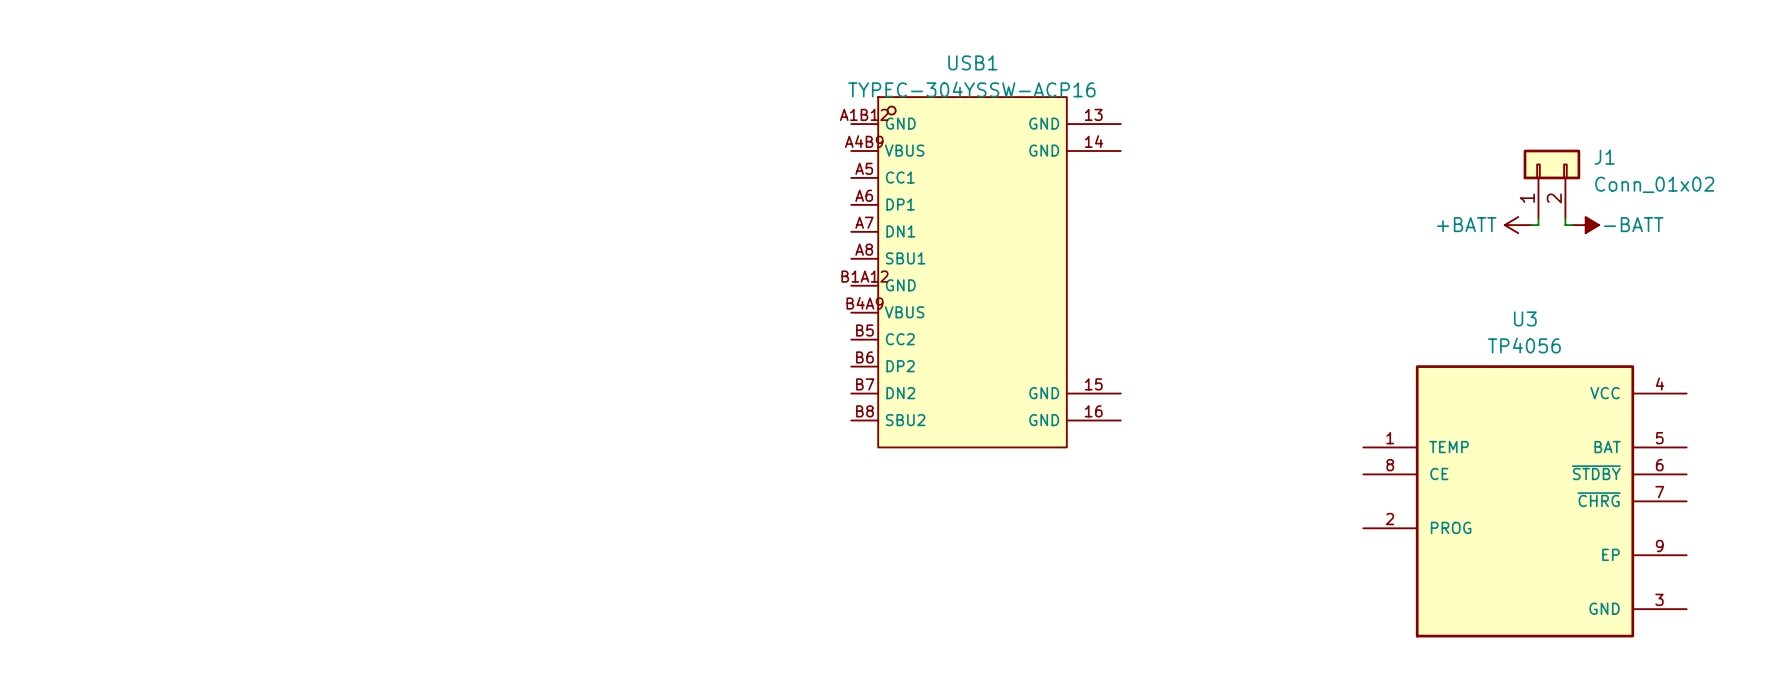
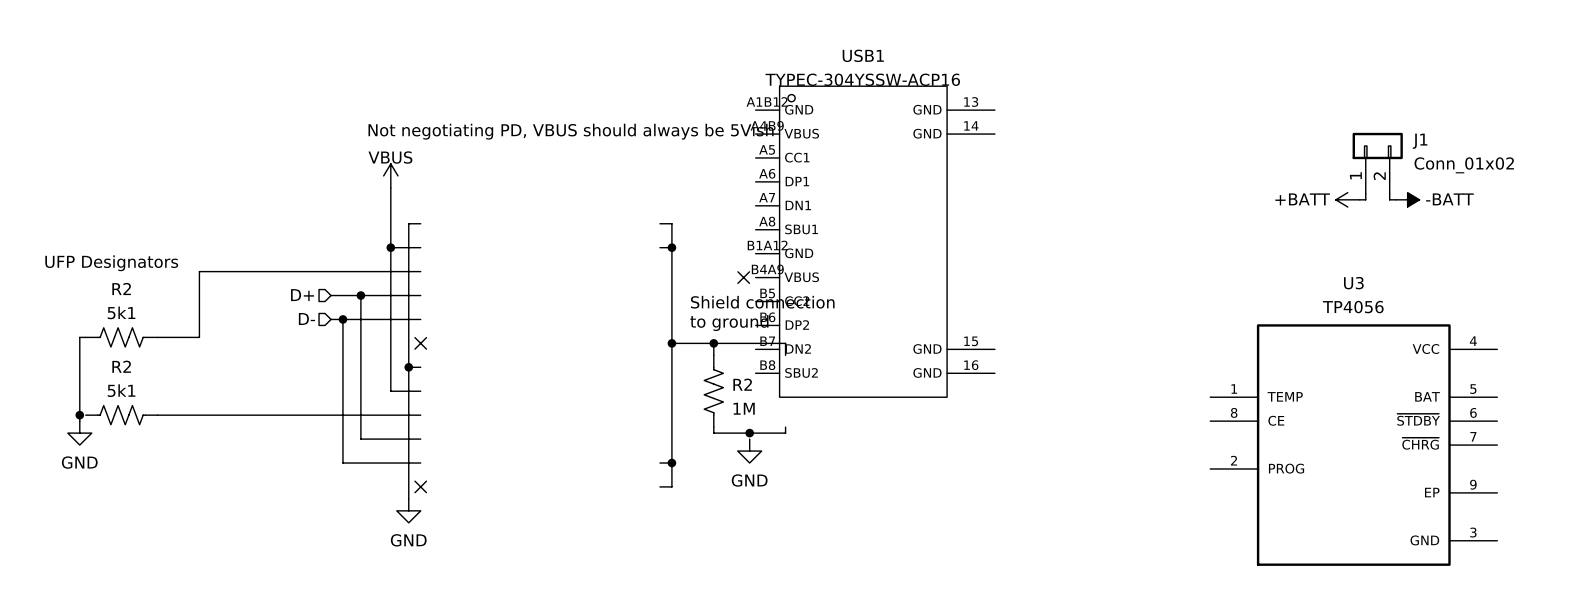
text: none -> Not negotiating PD, VBUS should always be 5Vish (571, 131)
power symbol: none -> VBUS (390, 175)
wire: none -> (390, 187) (390, 391) (420, 391)
wire: none -> (420, 223) (408, 223) (408, 498)
wire: none -> (659, 223) (671, 223) (671, 486) (659, 486)
wire: none -> (390, 247) (420, 247)
junction: none -> (390, 247)
wire: none -> (659, 247) (671, 247)
junction: none -> (671, 247)
text: none -> UFP Designators (111, 263)
wire: none -> (420, 271) (199, 271) (199, 337) (157, 337)
no-connect mark: none -> (743, 277)
hierarchical label: none -> D+ (302, 295)
wire: none -> (331, 295) (420, 295)
wire: none -> (360, 295) (360, 439) (420, 439)
junction: none -> (360, 295)
text: none -> Shield connection (762, 302)
hierarchical label: none -> D- (306, 319)
wire: none -> (331, 319) (420, 319)
wire: none -> (342, 319) (342, 463) (420, 463)
junction: none -> (342, 319)
text: none -> to ground (729, 323)
wire: none -> (85, 337) (79, 337) (79, 421)
R2: none -> 5k1 (121, 337)
no-connect mark: none -> (420, 343)
wire: none -> (671, 343) (785, 343) (785, 355)
junction: none -> (671, 343)
wire: none -> (713, 343) (713, 355)
junction: none -> (713, 343)
wire: none -> (408, 367) (420, 367)
junction: none -> (408, 367)
R2: none -> 1M (713, 391)
junction: none -> (79, 415)
R2: none -> 5k1 (121, 415)
wire: none -> (157, 415) (420, 415)
wire: none -> (713, 427) (713, 433) (785, 433) (785, 427)
power symbol: none -> GND (79, 433)
junction: none -> (749, 433)
power symbol: none -> GND (749, 451)
wire: none -> (659, 463) (671, 463)
junction: none -> (671, 463)
no-connect mark: none -> (420, 486)
power symbol: none -> GND (408, 510)

